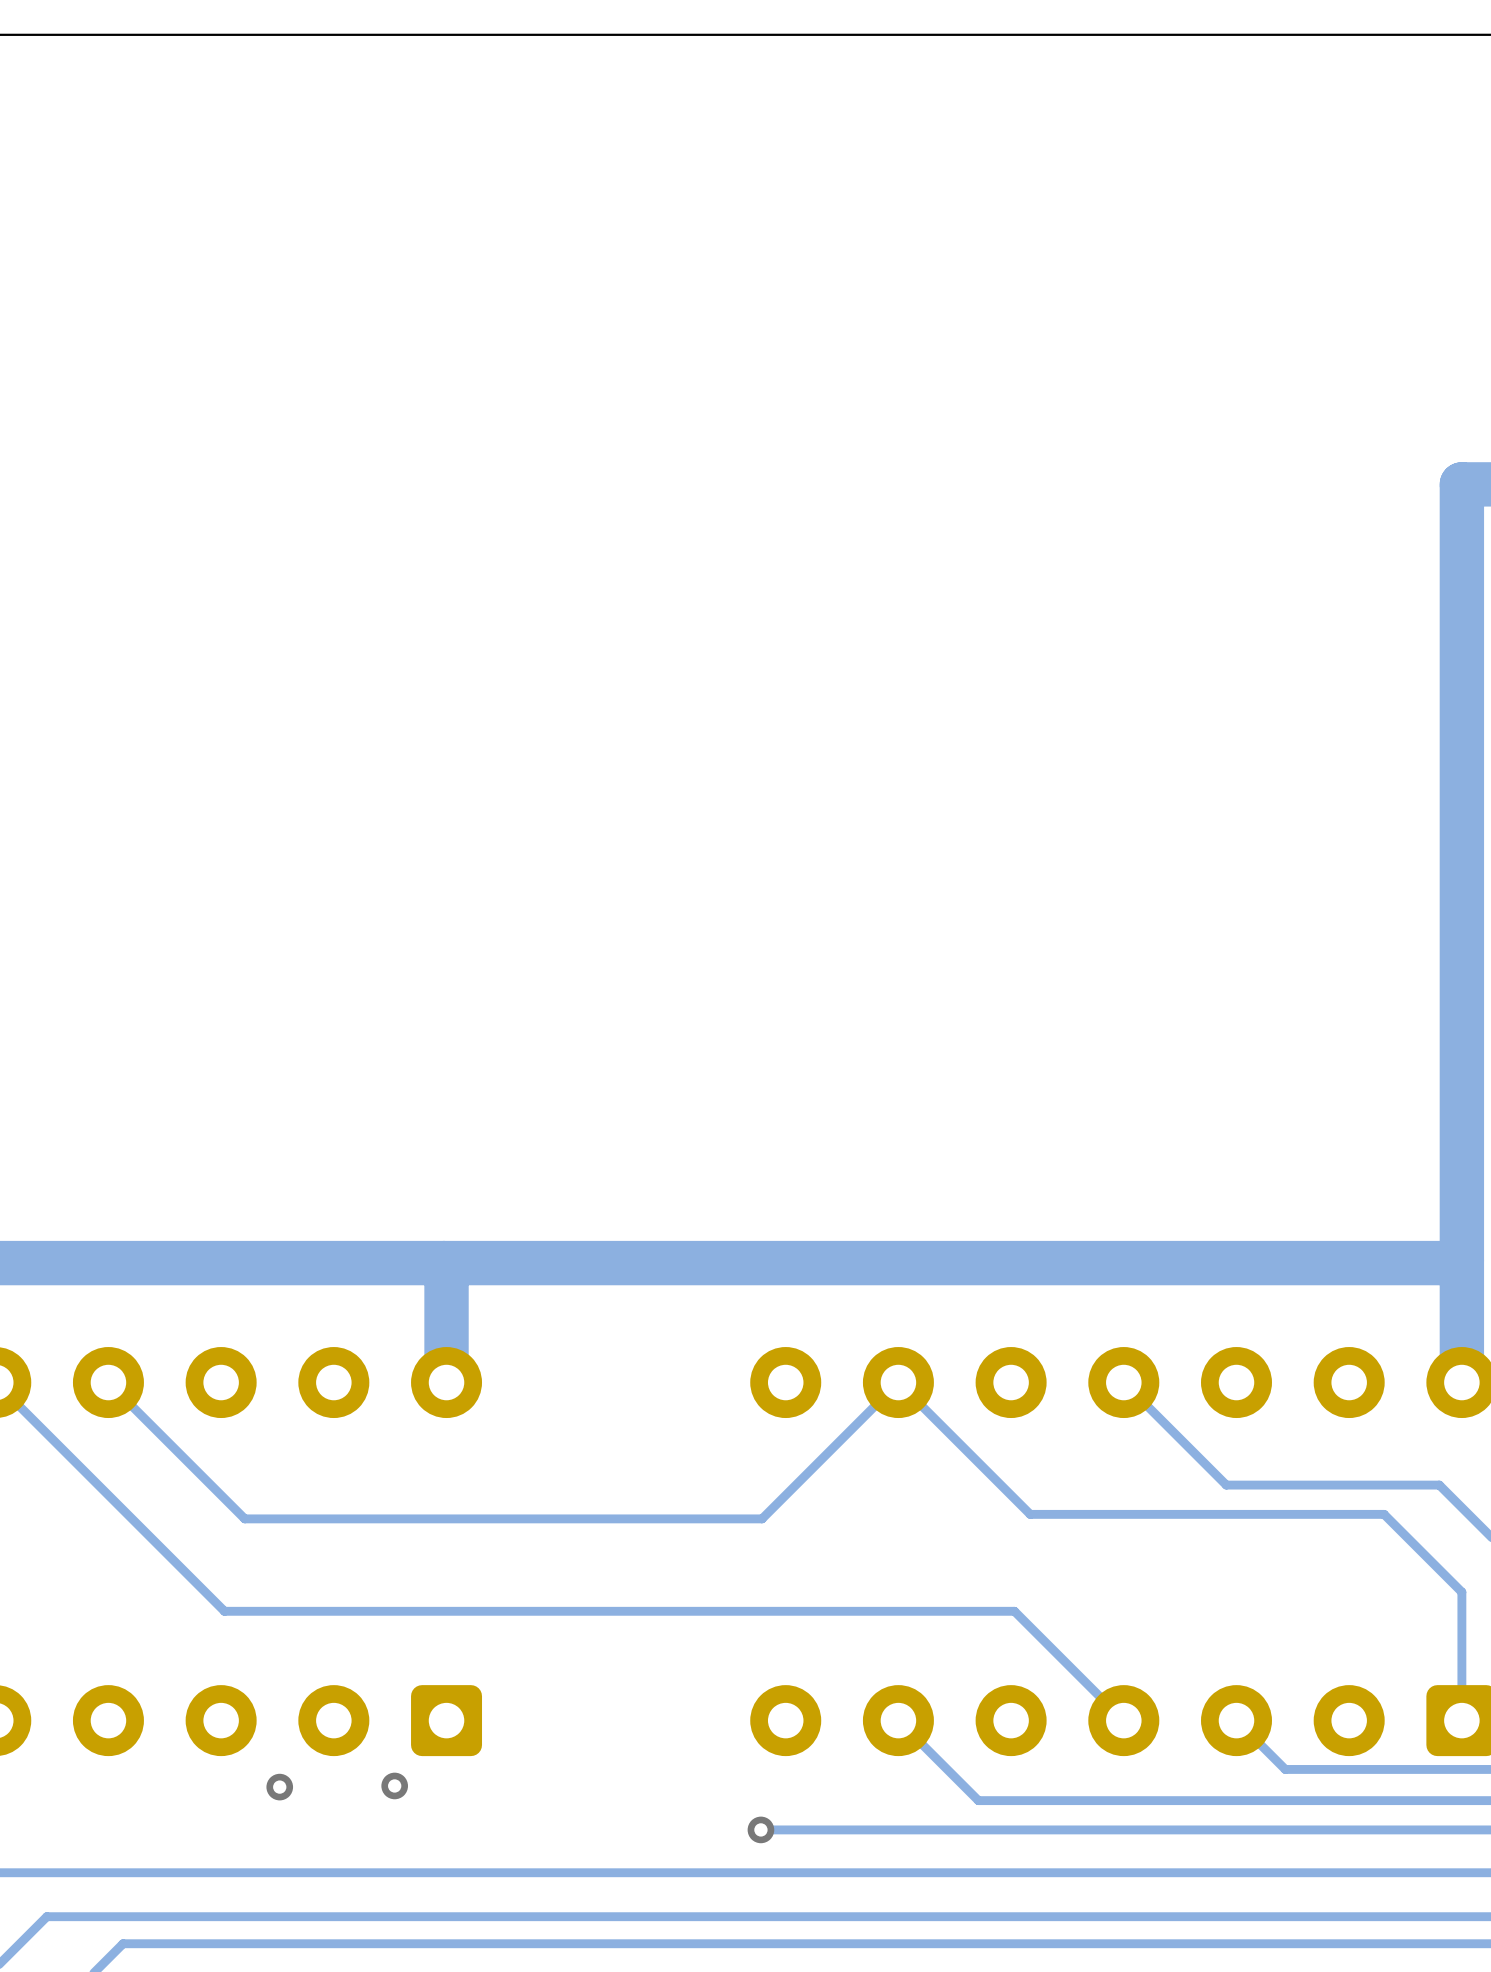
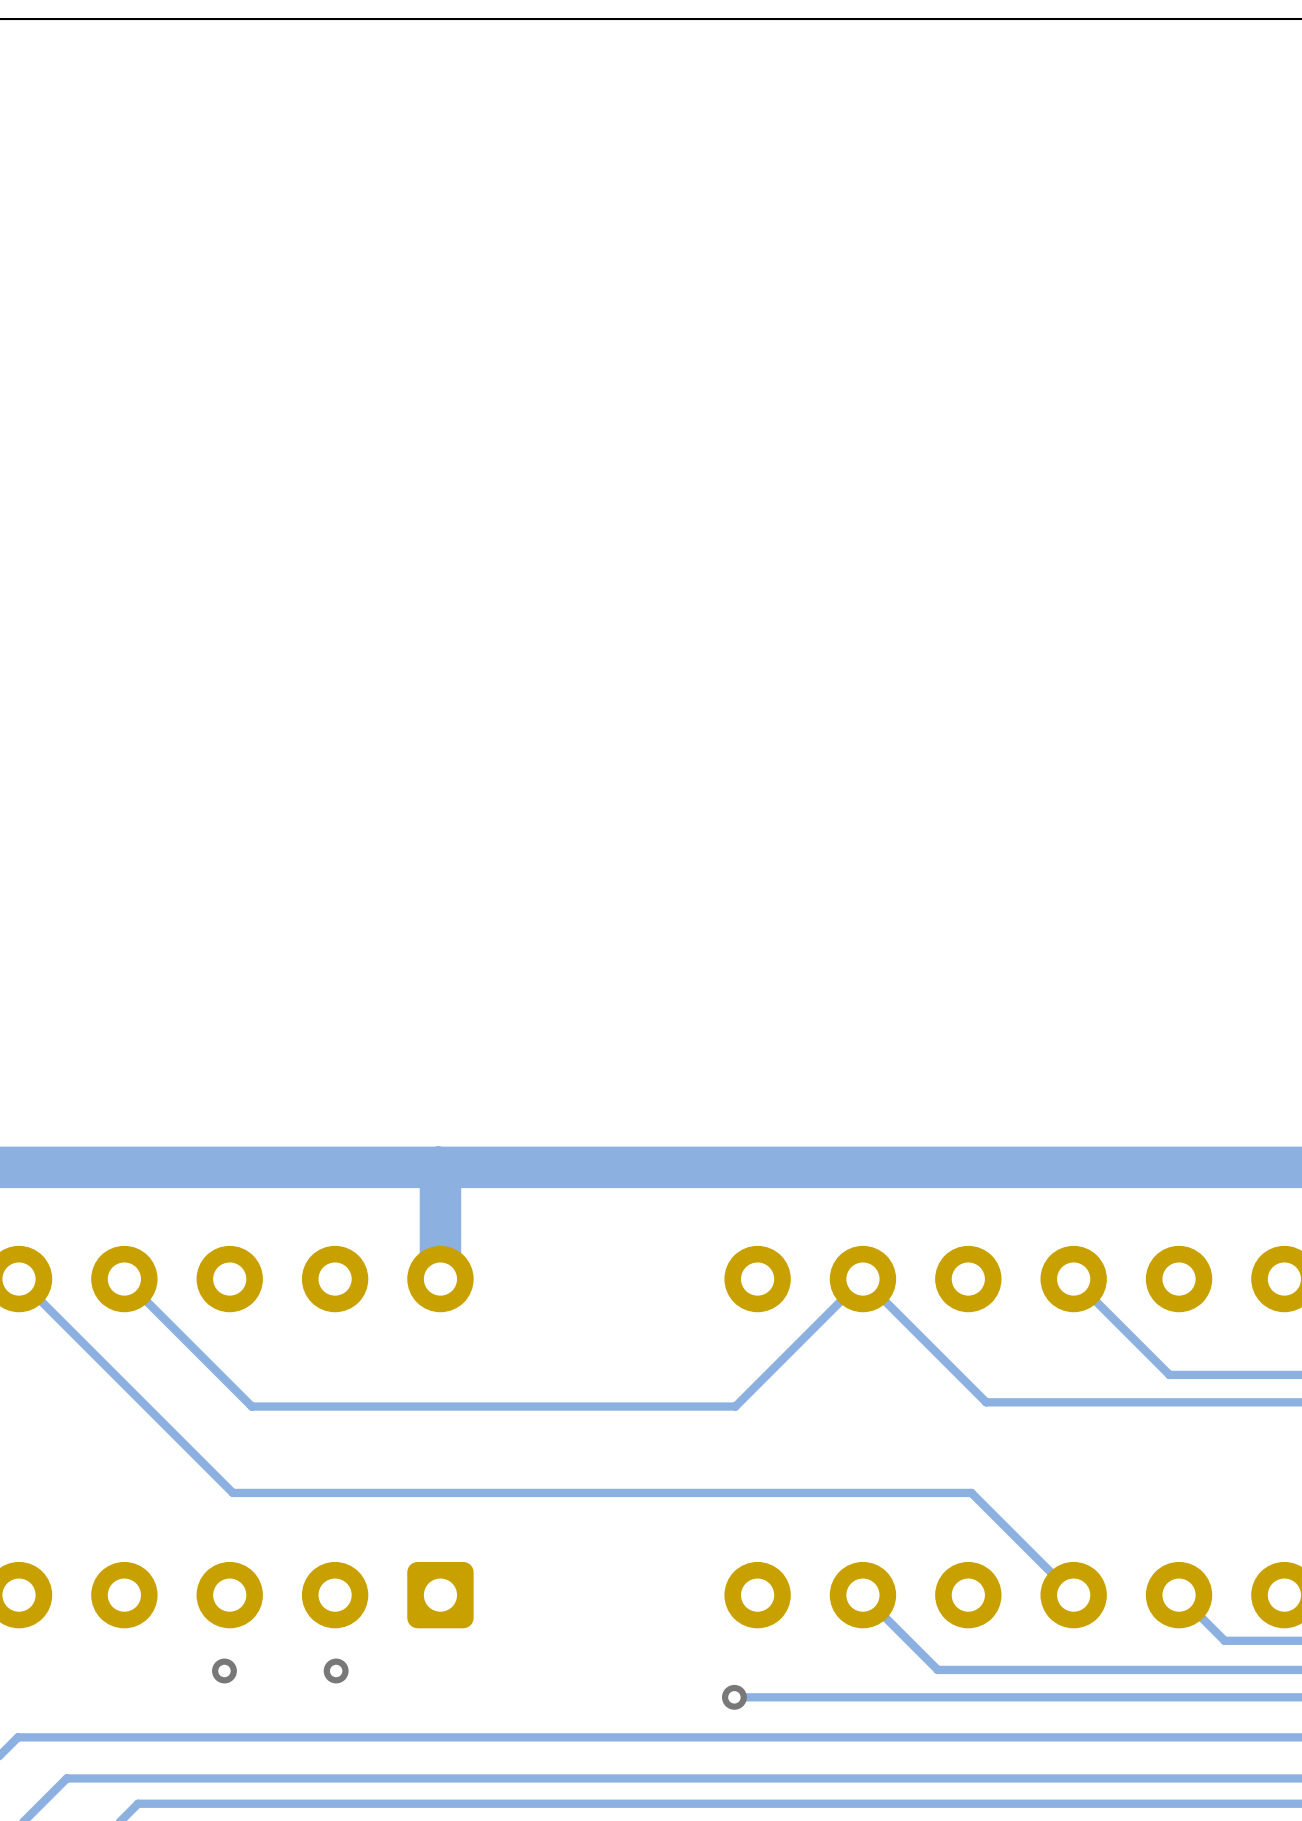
via: (394, 1785) -> none
via: (279, 1787) -> none
via: none -> (224, 1670)
via: none -> (336, 1670)

